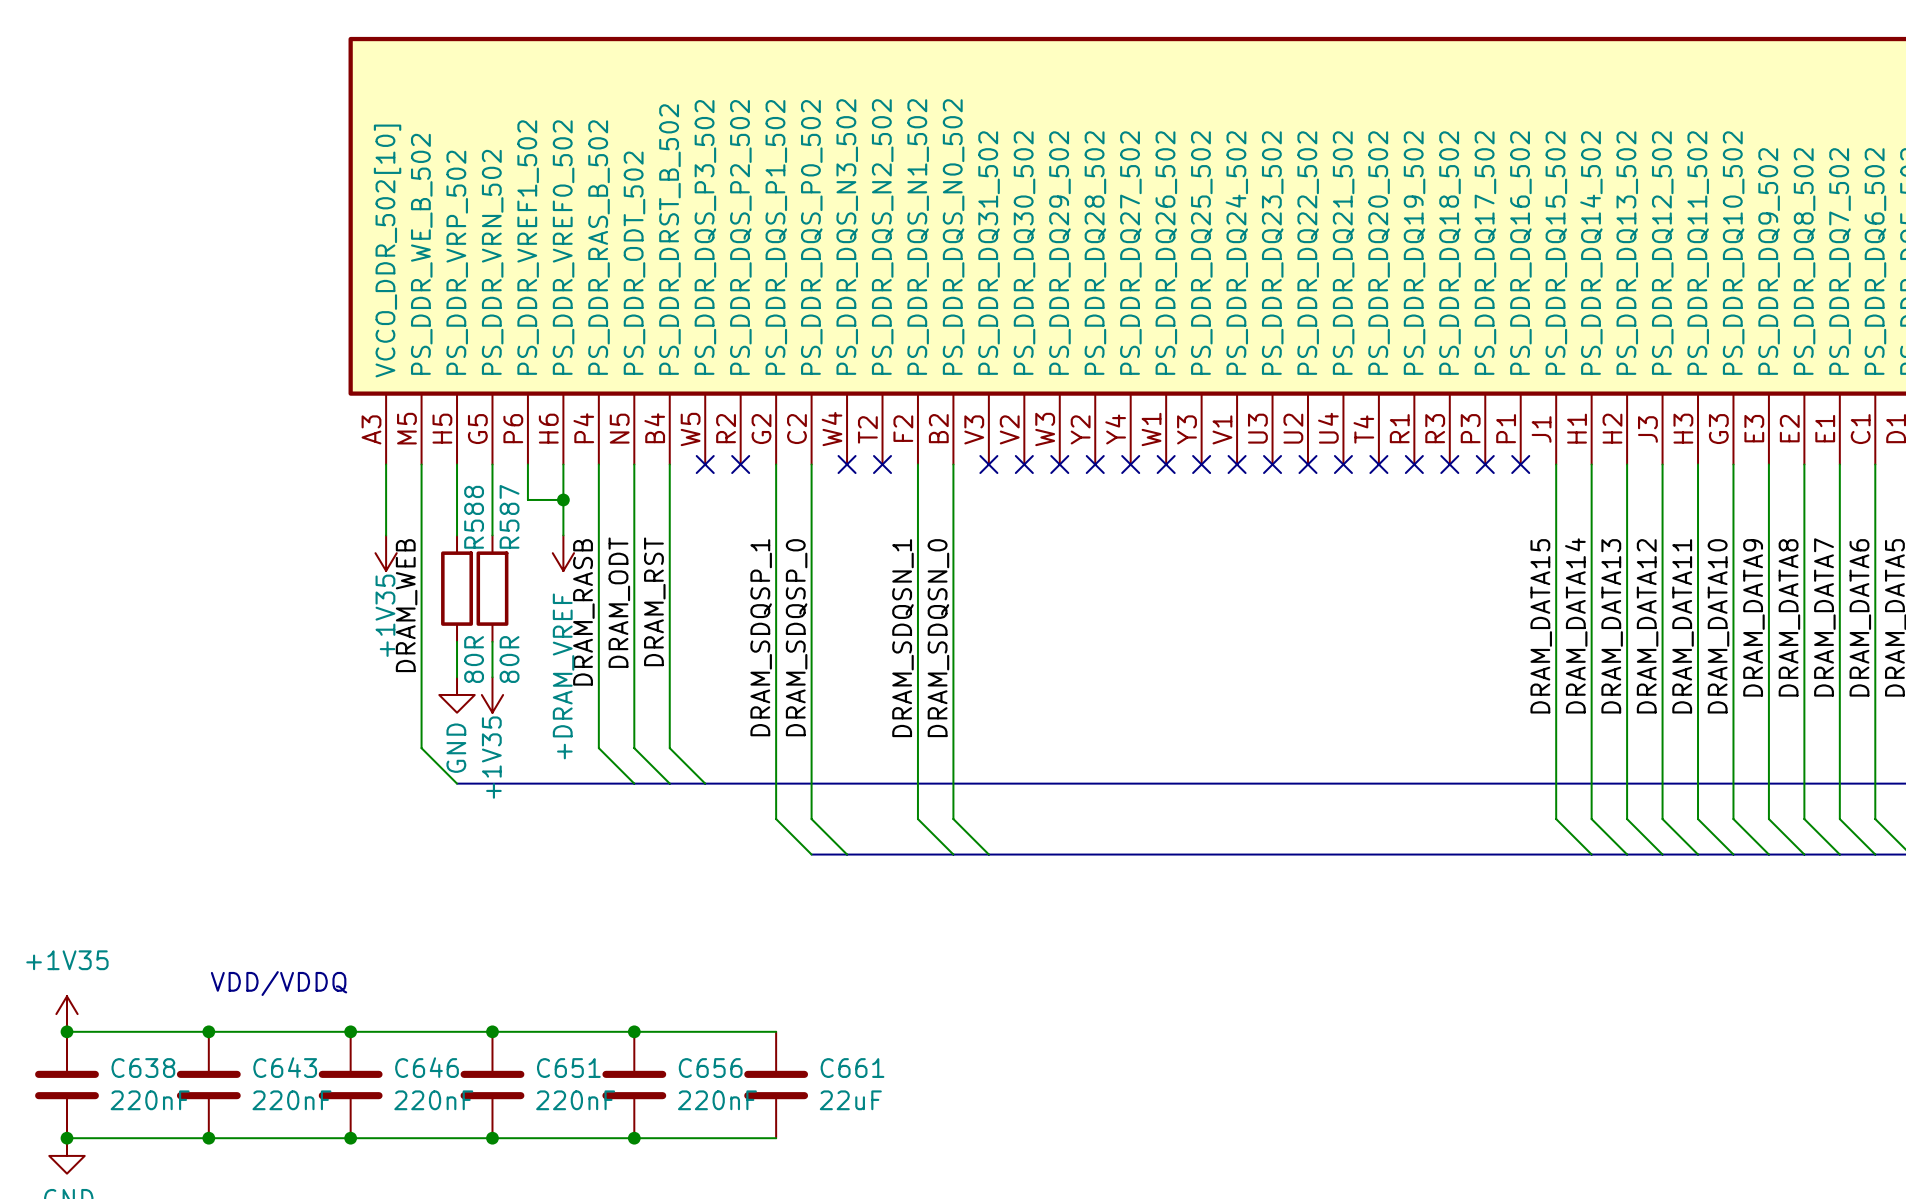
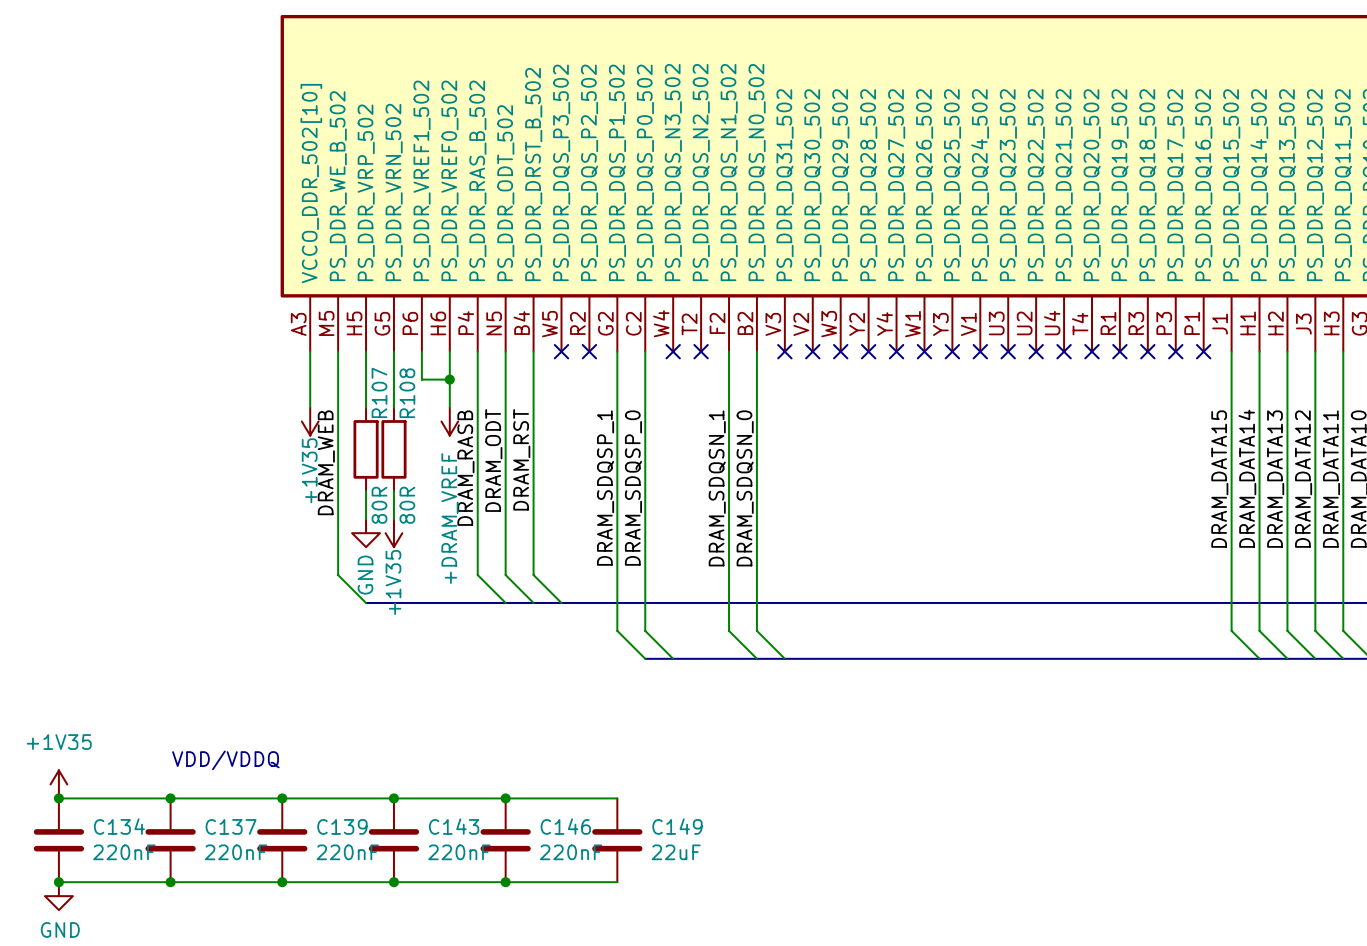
R587 name: R587 (509, 516) -> R108 (407, 393)
R588 name: R588 (474, 517) -> R107 (379, 392)
C643 name: C643 (285, 1067) -> C137 (231, 826)
C646 name: C646 (427, 1067) -> C139 (342, 826)
C638 name: C638 (143, 1068) -> C134 (119, 826)
C651 name: C651 (568, 1068) -> C143 (454, 826)
C656 name: C656 (710, 1068) -> C146 (565, 826)
C661 name: C661 (852, 1068) -> C149 (677, 826)

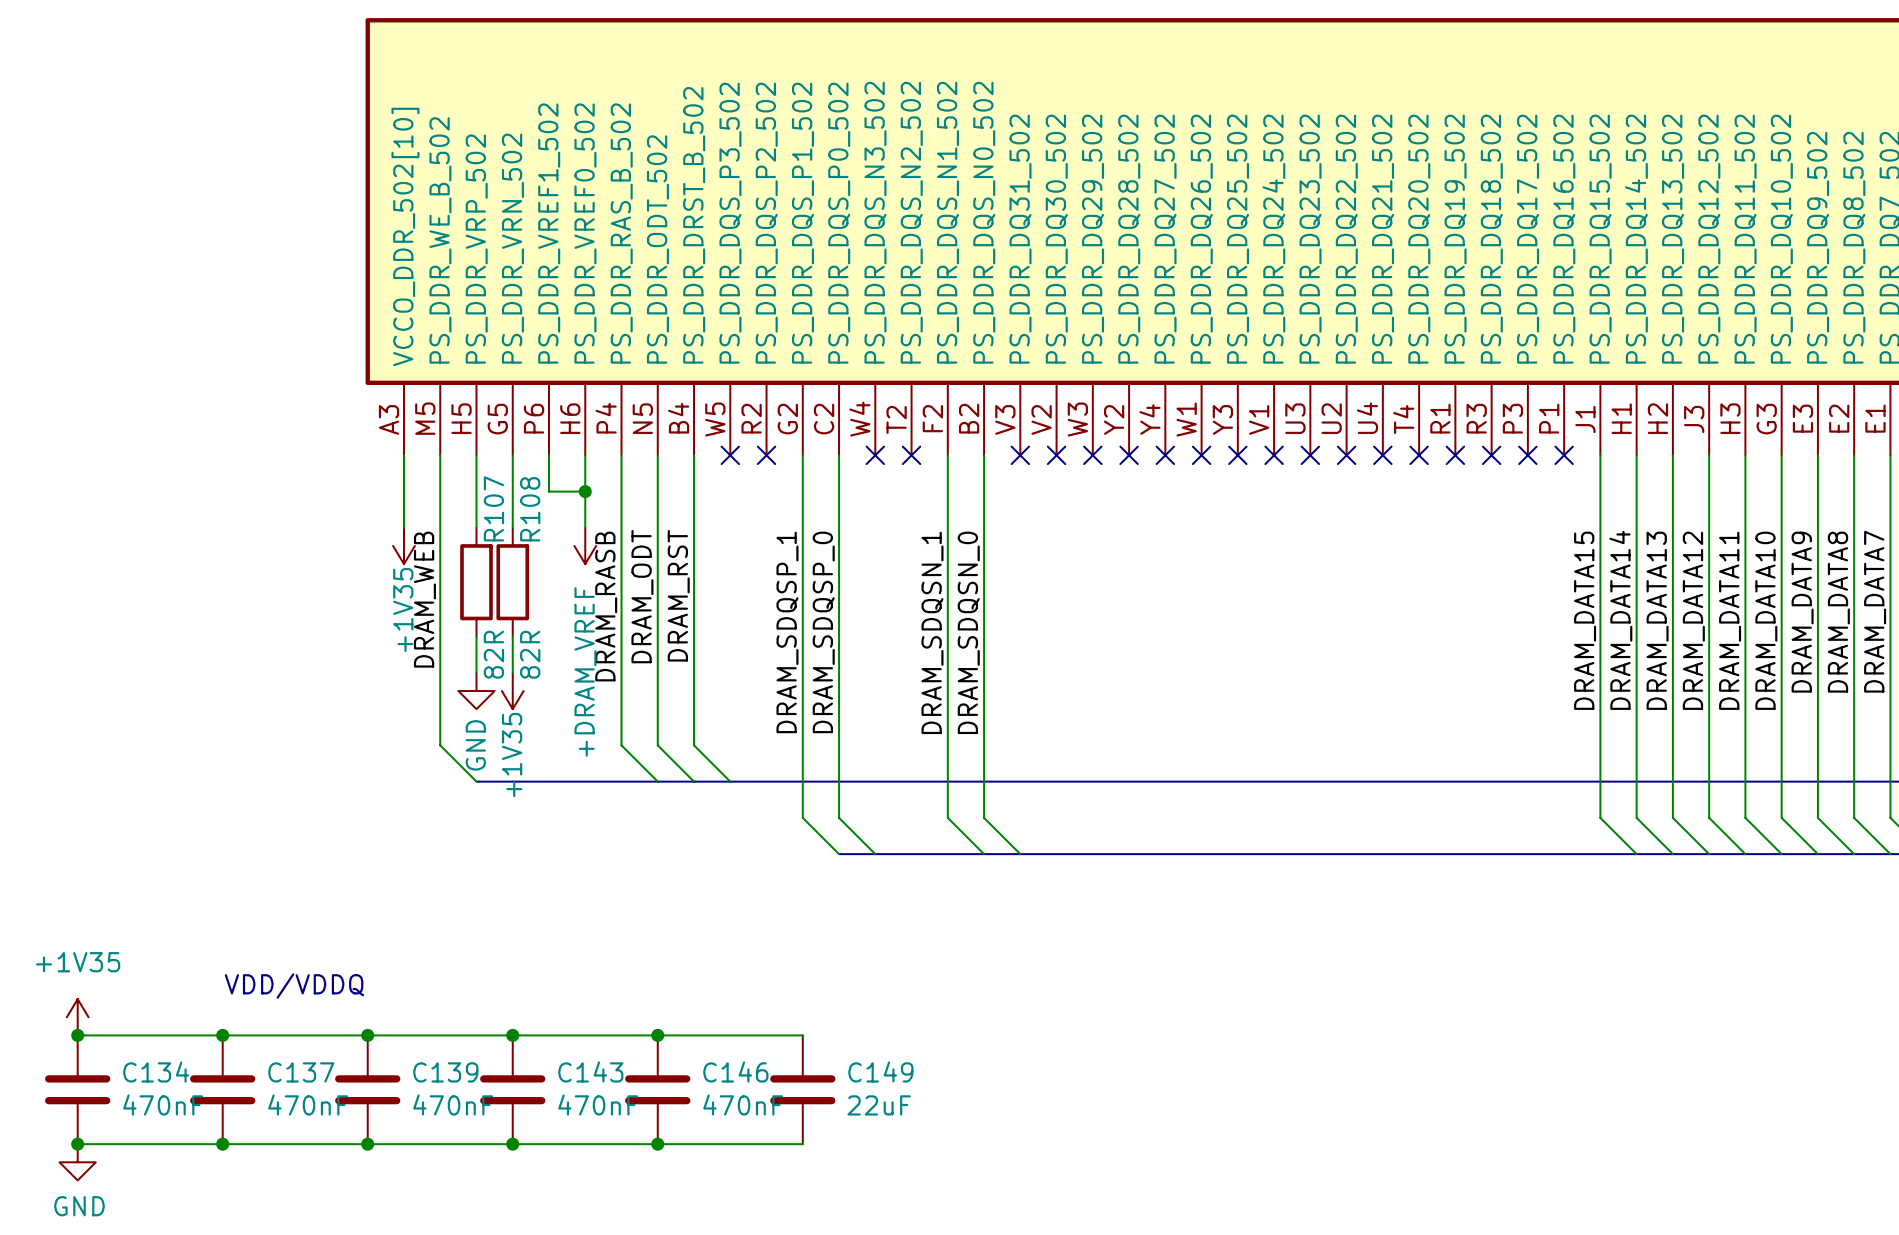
R107 value: 80R (379, 505) -> 82R (493, 654)
R108 value: 80R (407, 505) -> 82R (530, 654)
C134 value: 220nF (124, 852) -> 470nF (163, 1104)
C137 value: 220nF (236, 852) -> 470nF (308, 1104)
C139 value: 220nF (347, 852) -> 470nF (453, 1104)
C143 value: 220nF (459, 852) -> 470nF (598, 1104)
C146 value: 220nF (571, 852) -> 470nF (743, 1104)

